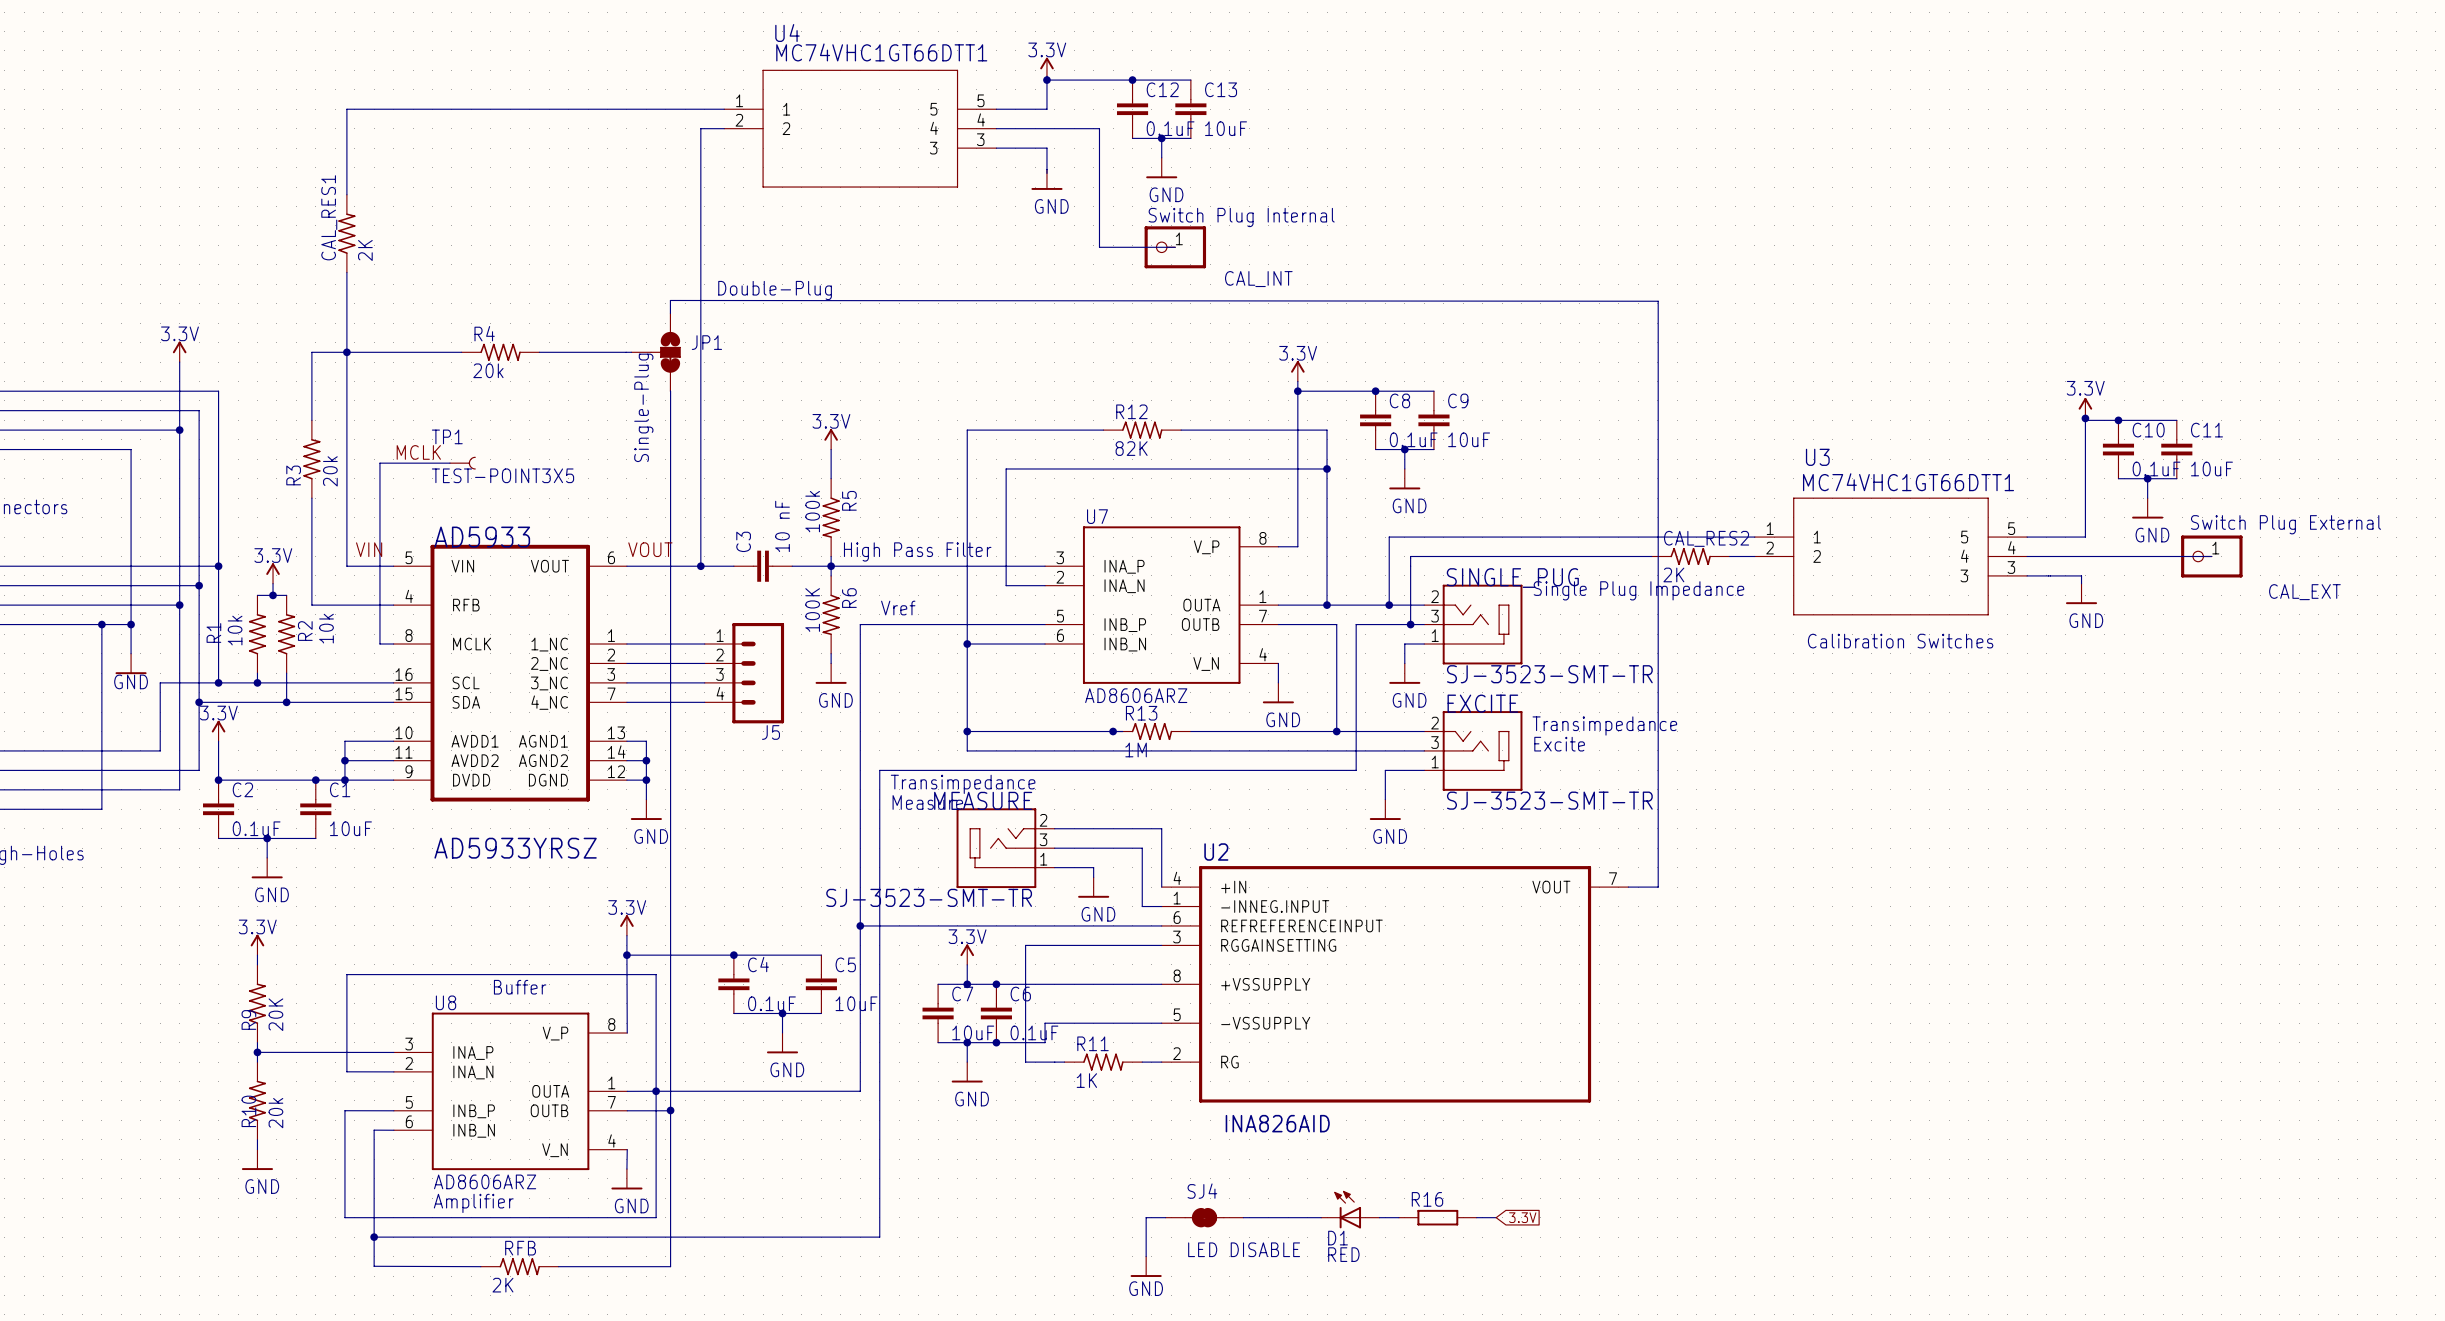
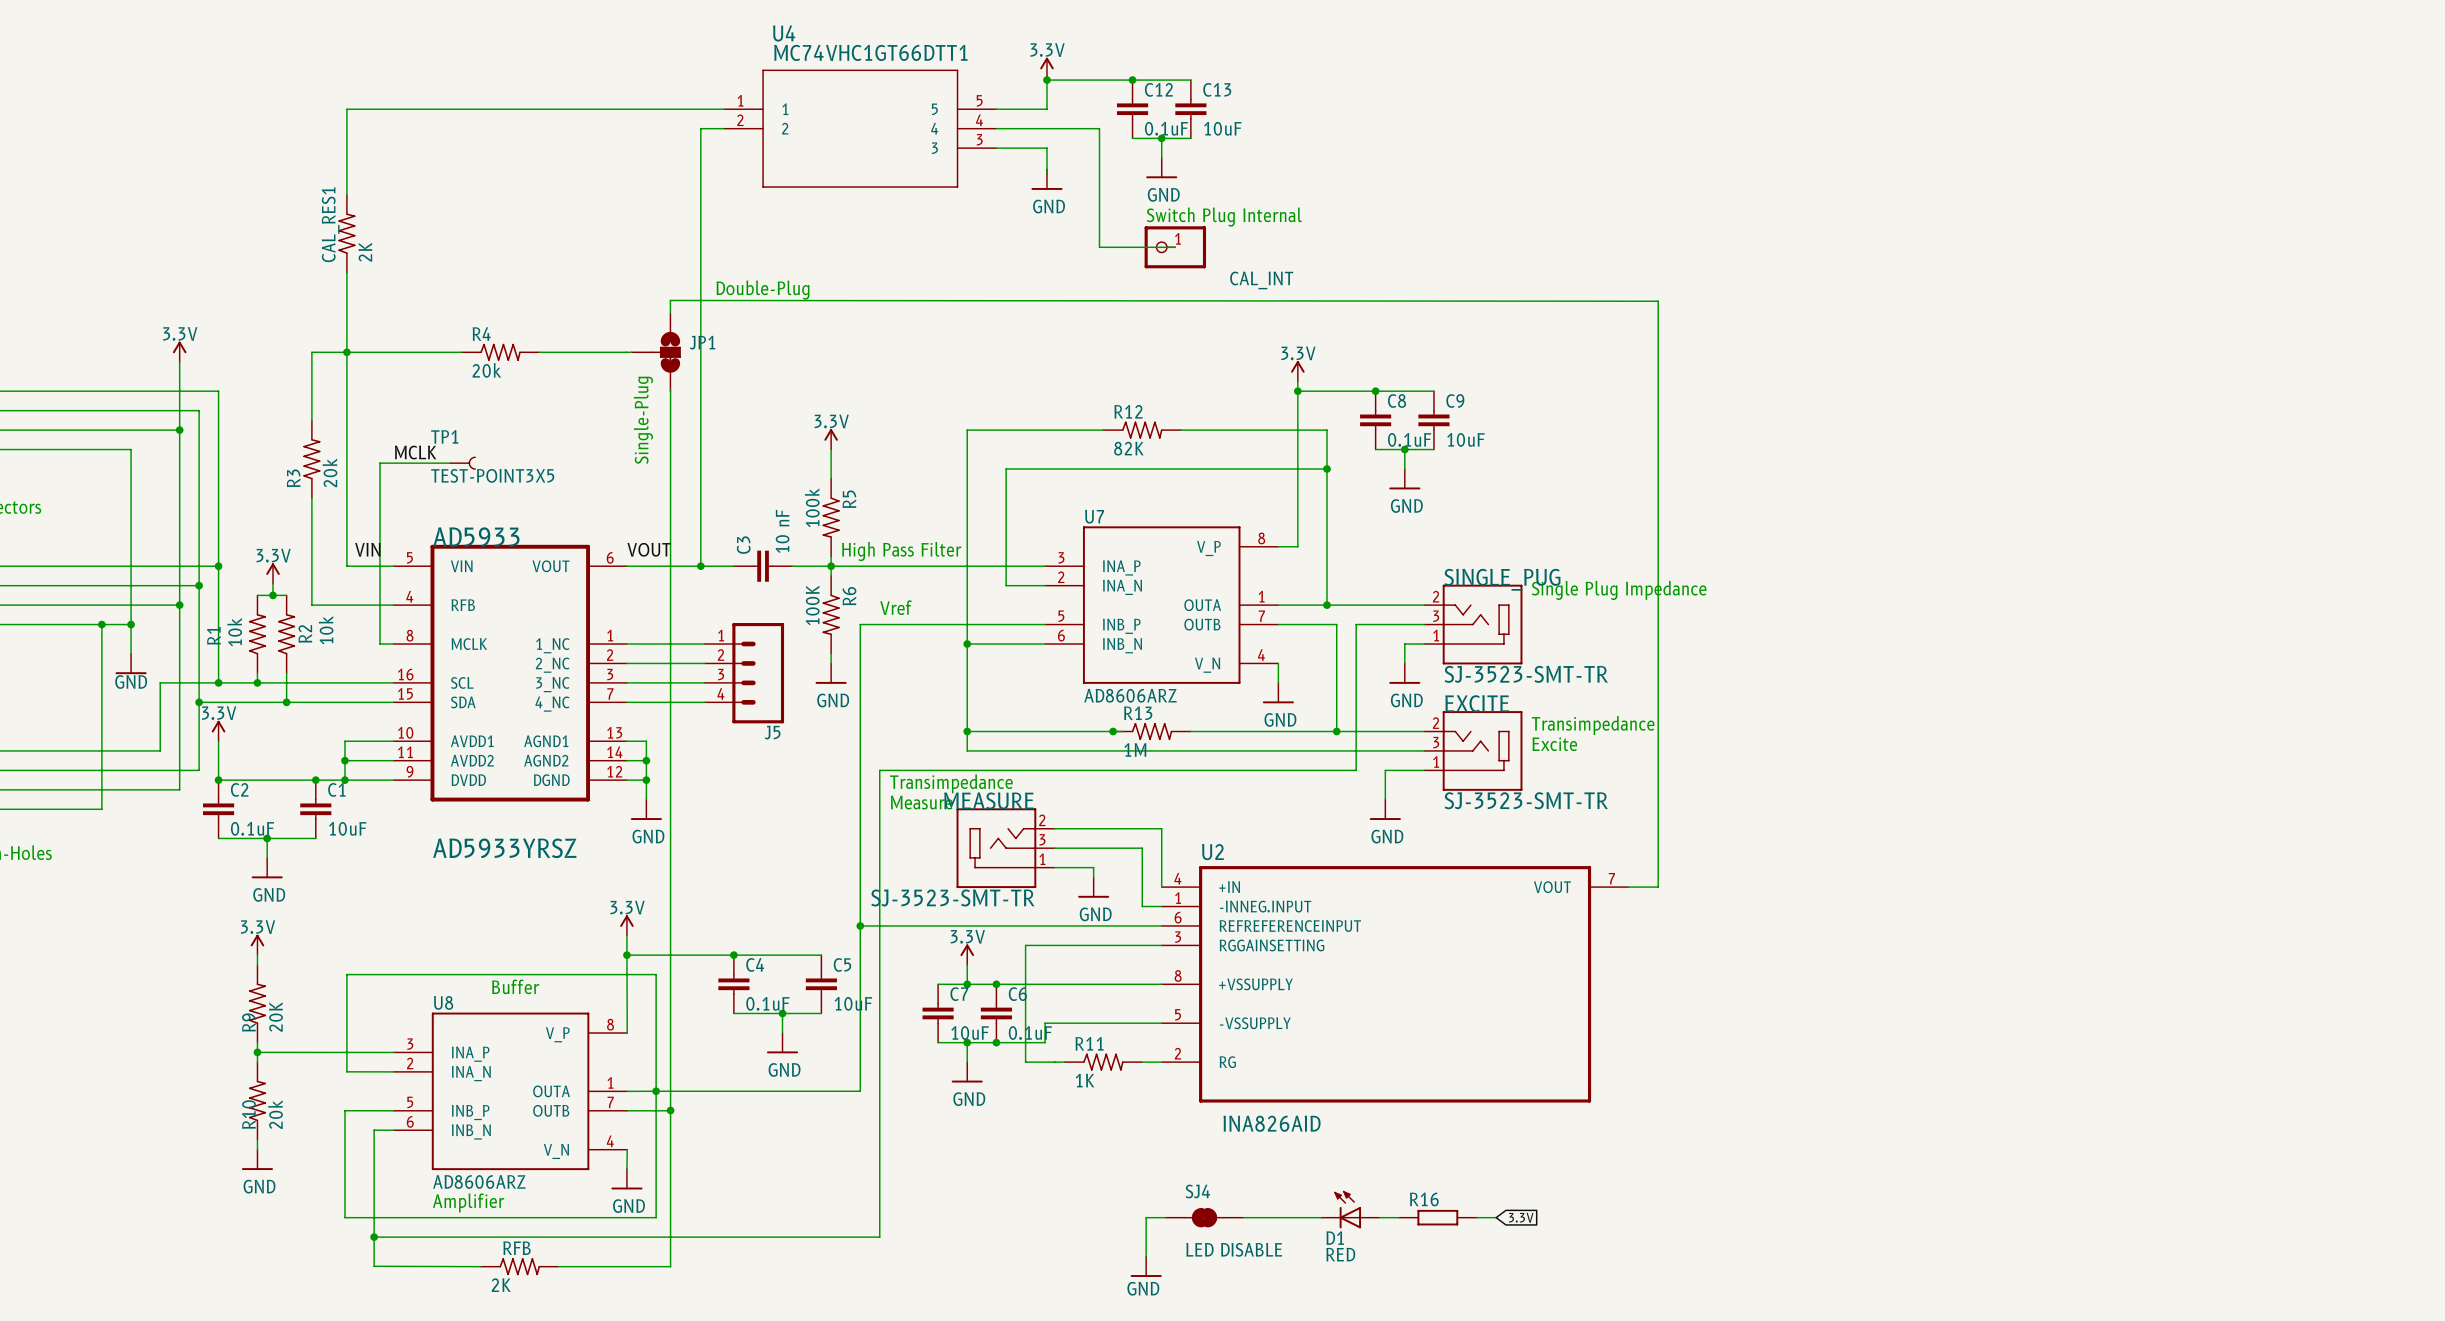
power symbol: 3.3V (2085, 408) -> none
wire: (2085, 418) (2085, 537) (2027, 537) -> none
junction: (2085, 418) -> none
wire: (2085, 420) (2176, 420) -> none
junction: (2118, 420) -> none
C10: 0.1uF (2118, 449) -> none
C11: 10uF (2176, 449) -> none
wire: (2118, 478) (2176, 478) -> none
wire: (2147, 478) (2147, 498) -> none
junction: (2147, 478) -> none
power symbol: GND (2147, 508) -> none
text: Switch Plug External (2286, 524) -> none
wire: (1754, 537) (1389, 537) (1389, 605) -> none
wire: (1651, 556) (1410, 556) (1410, 624) -> none
CAL_RES2: 2K (1690, 556) -> none
wire: (1729, 556) (1754, 556) -> none
U3: MC74VHC1GT66DTT1 (1890, 556) -> none
wire: (2027, 556) (2211, 556) -> none
CAL_EXT: (2211, 556) -> none
wire: (2027, 575) (2081, 575) (2081, 583) -> none
power symbol: GND (2081, 593) -> none
junction: (1389, 605) -> none
junction: (1410, 624) -> none
text: Calibration Switches (1900, 641) -> none

